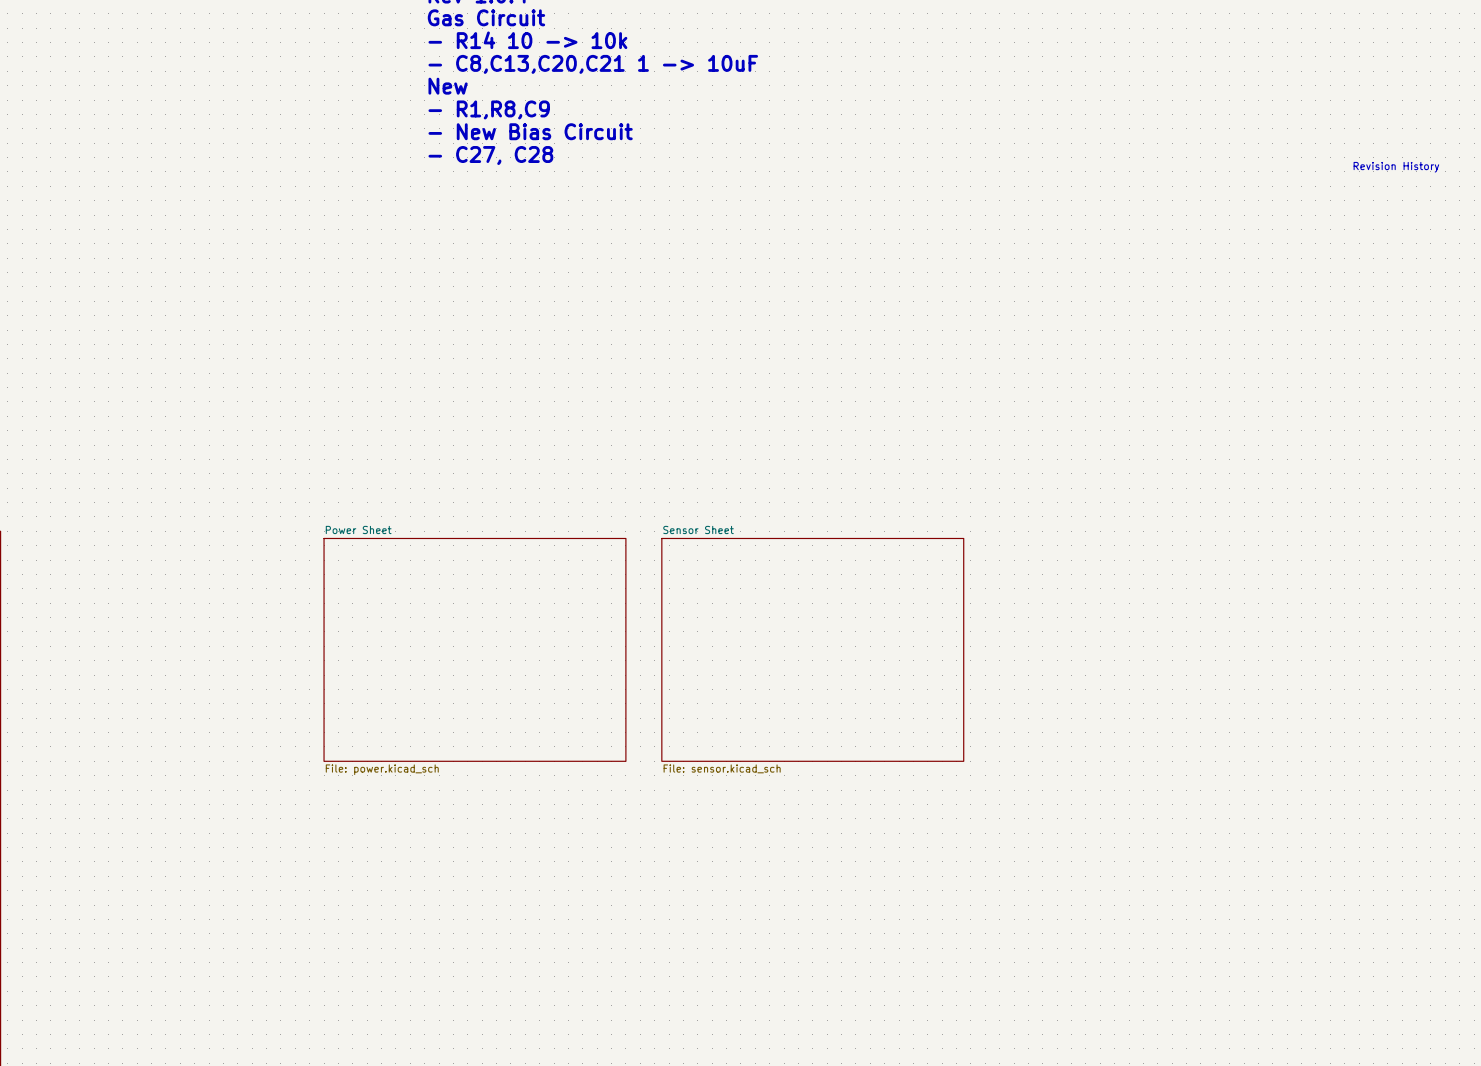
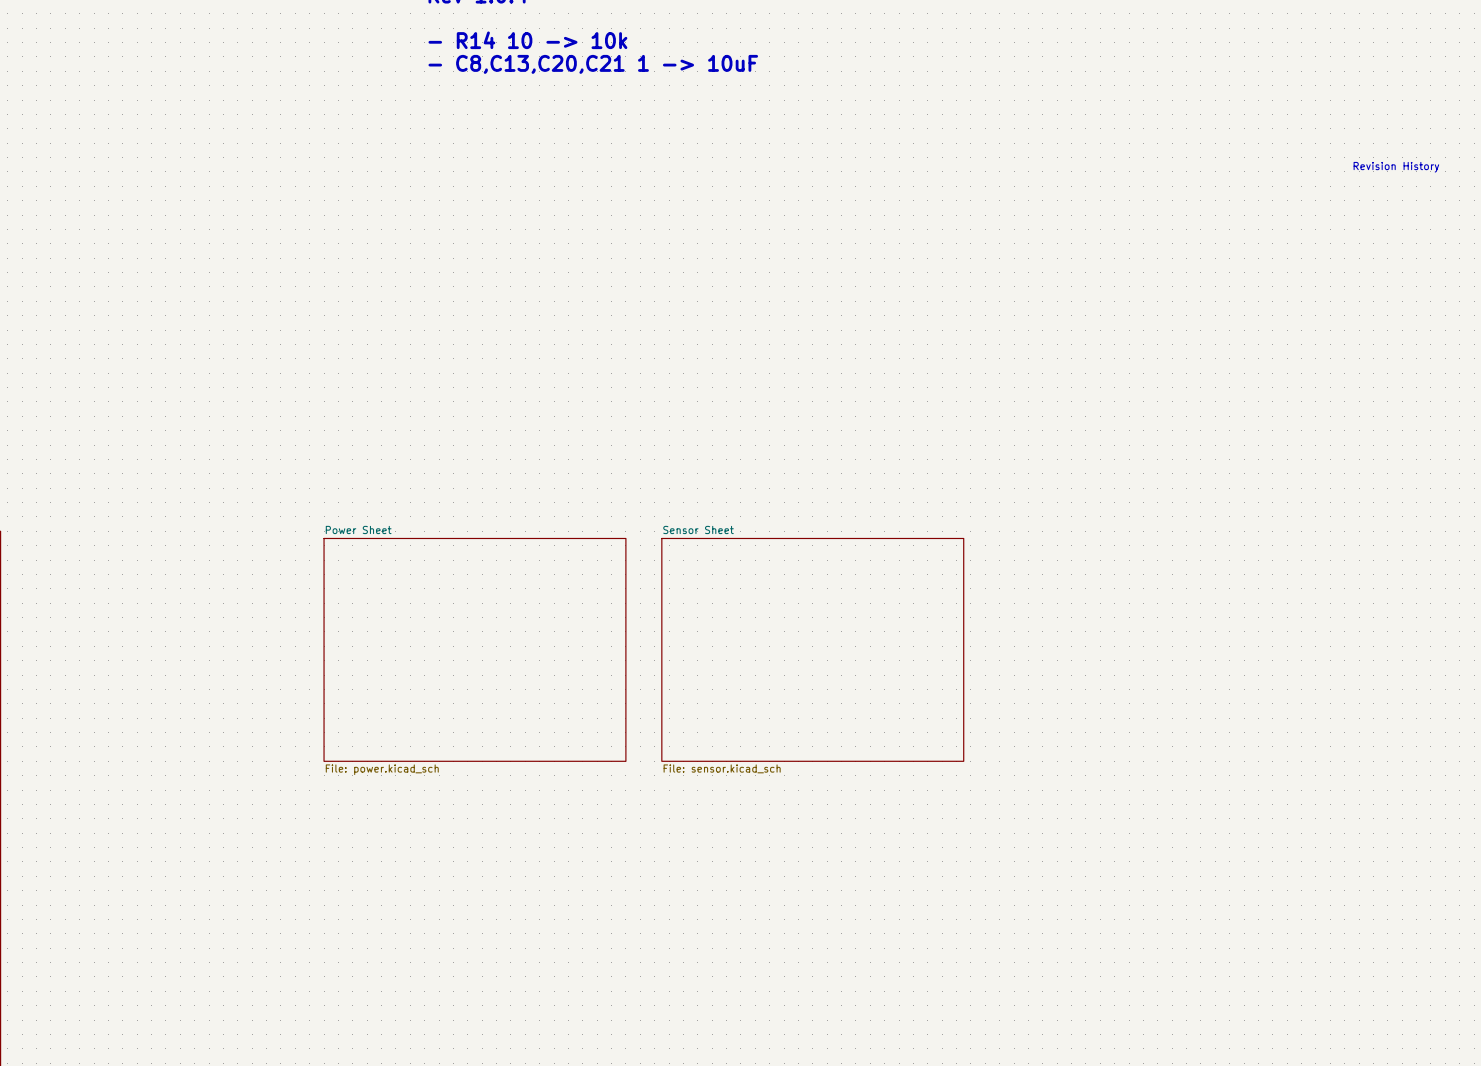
text: Gas Circuit (486, 17) -> none
text: New (448, 86) -> none
text: - R1,R8,C9 (489, 109) -> none
text: - New Bias Circuit (530, 131) -> none
text: - C27, C28 (490, 155) -> none

